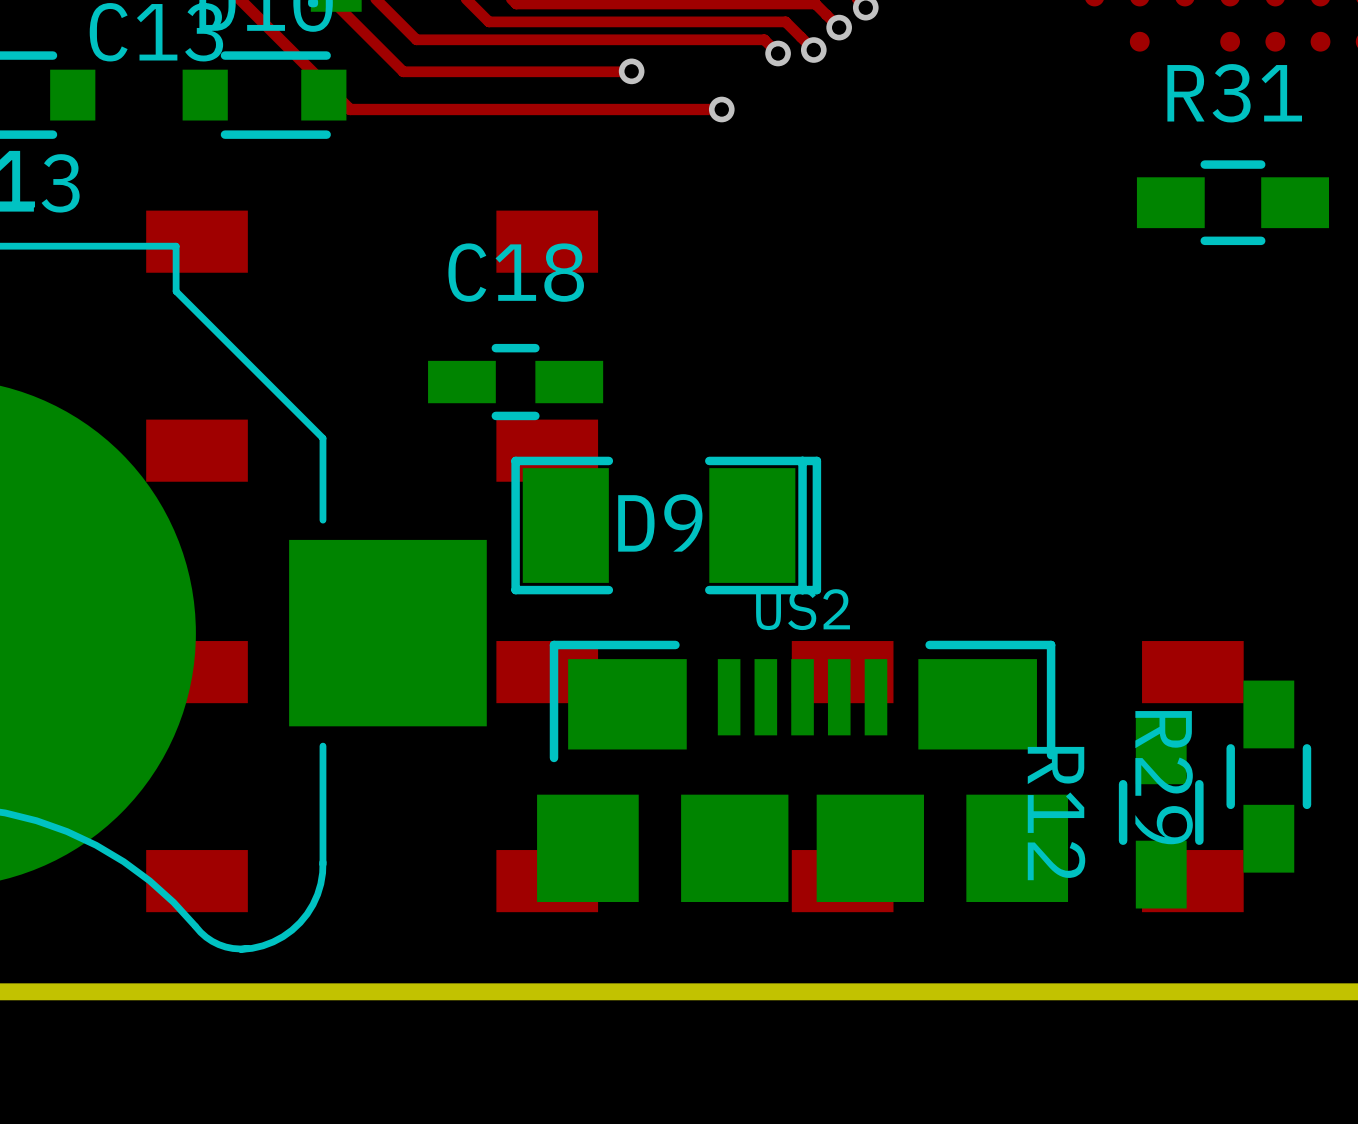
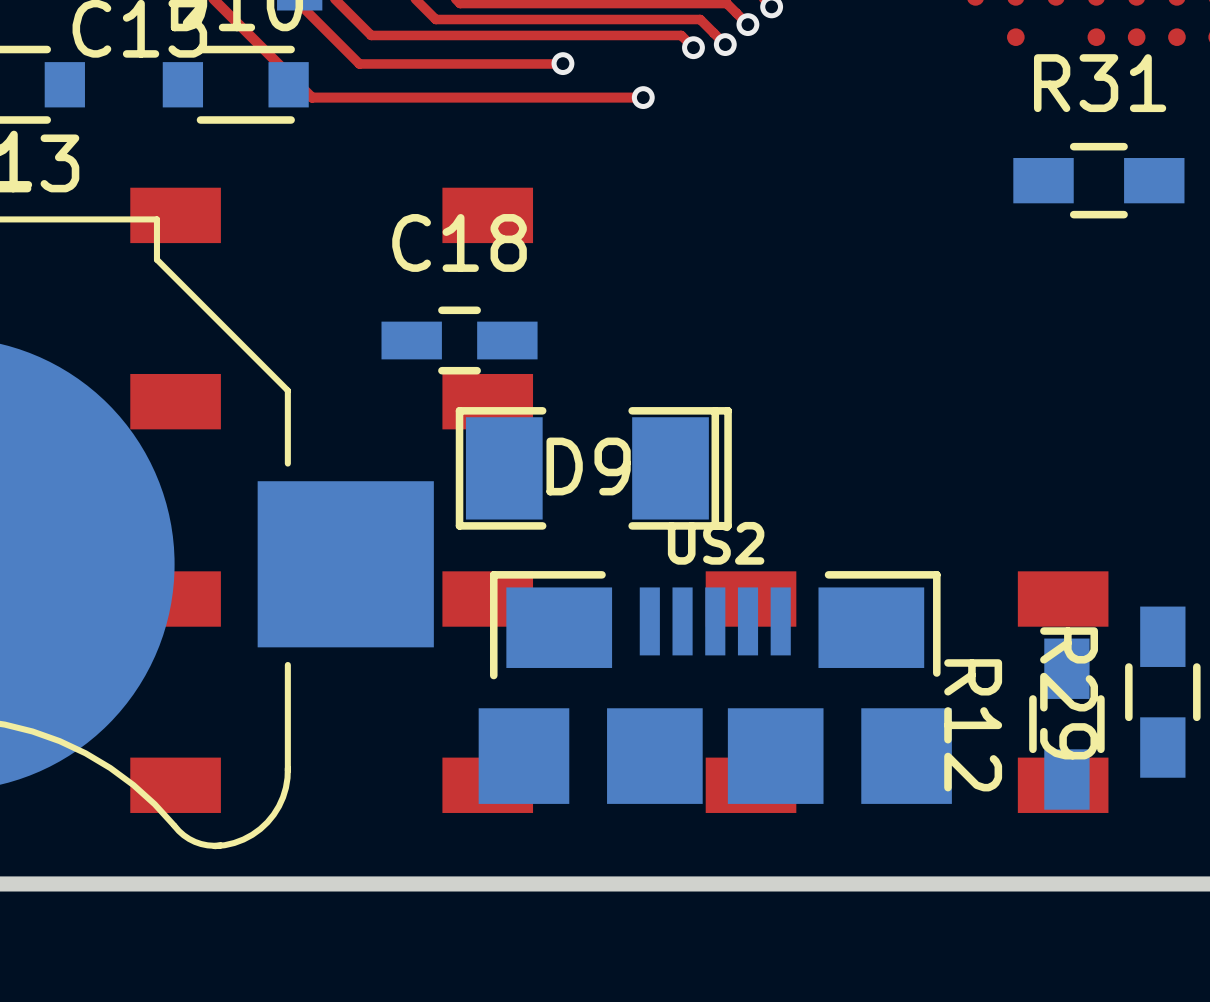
R29 position: (1268, 776) -> (1162, 692)
R12 position: (1161, 812) -> (1066, 724)

